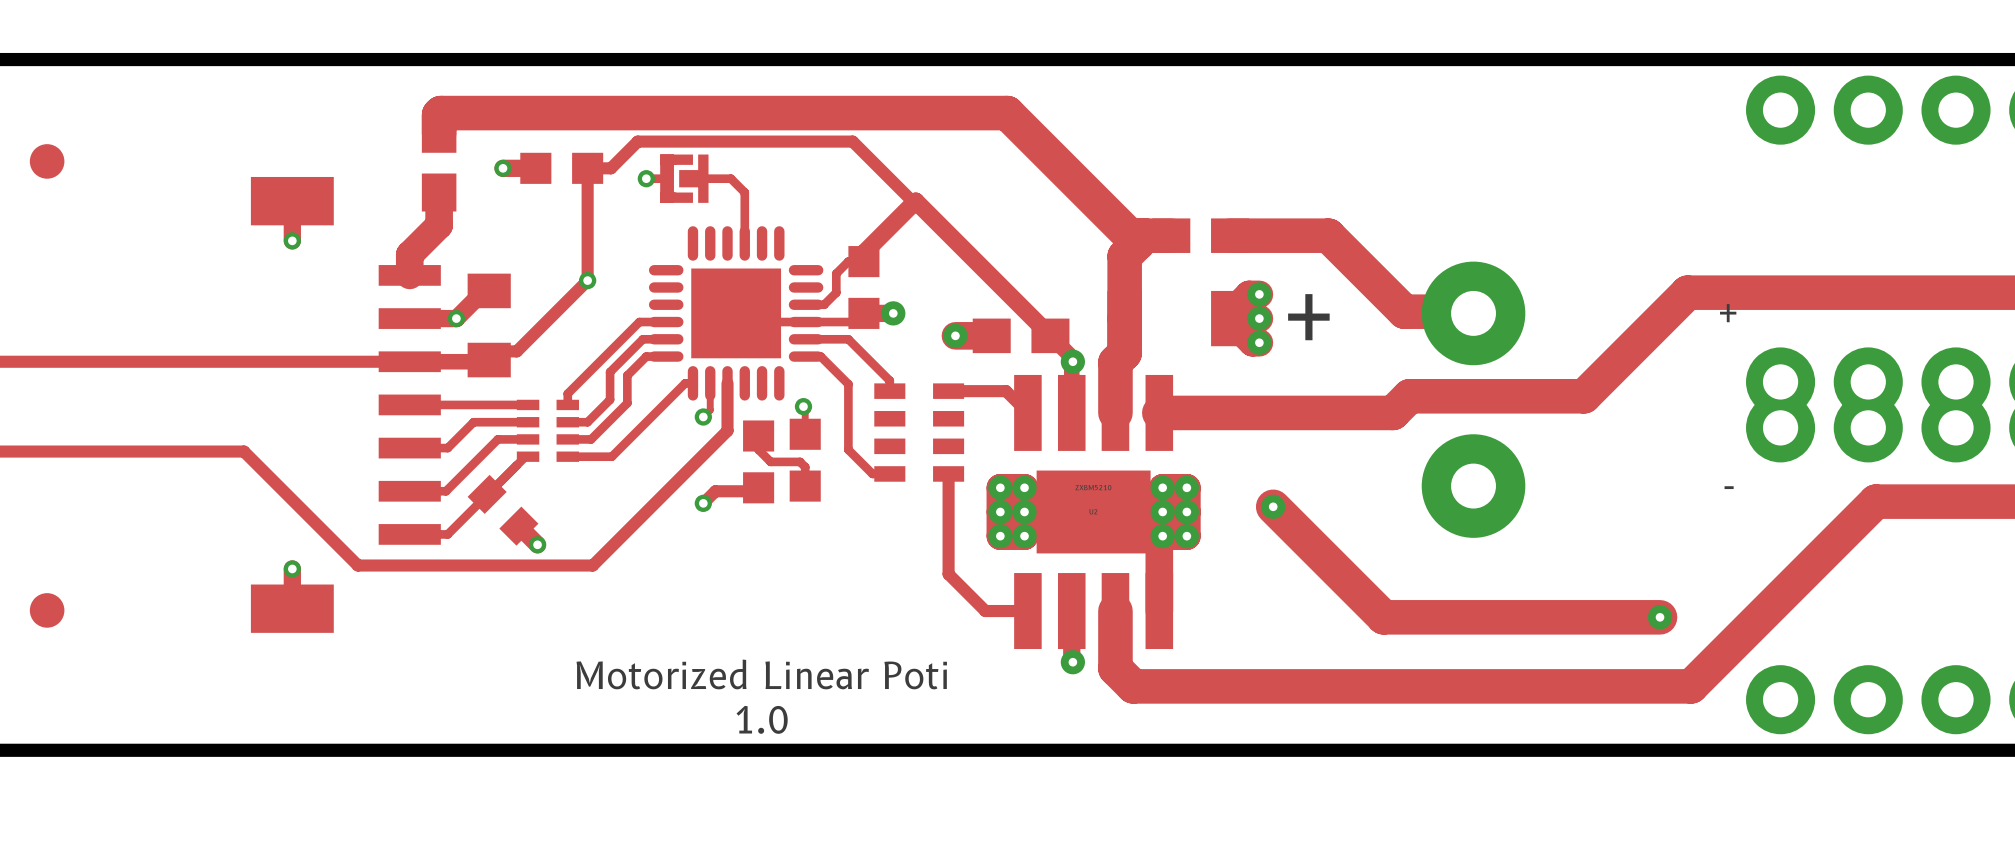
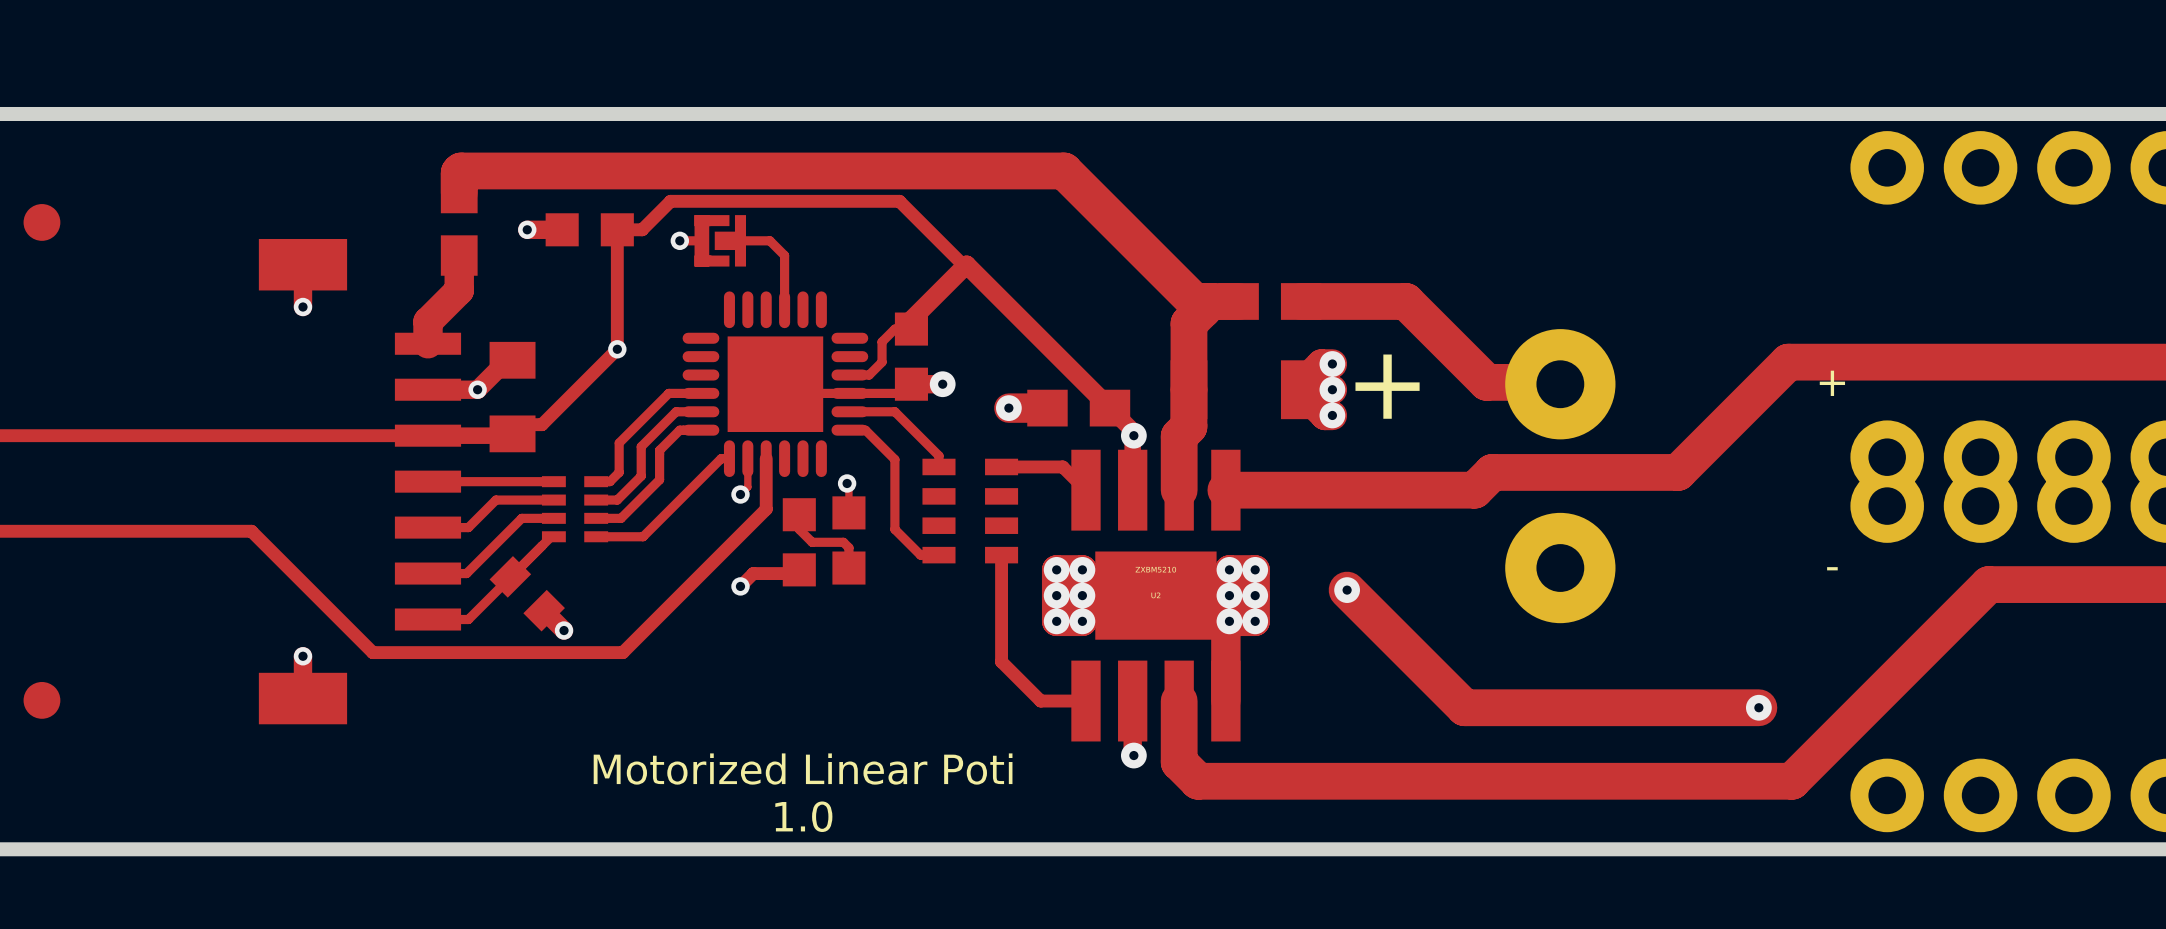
track: (639, 322) (567, 393) (567, 404) -> (672, 393) (668, 393) (619, 443) (619, 472) (609, 481) (596, 481)

